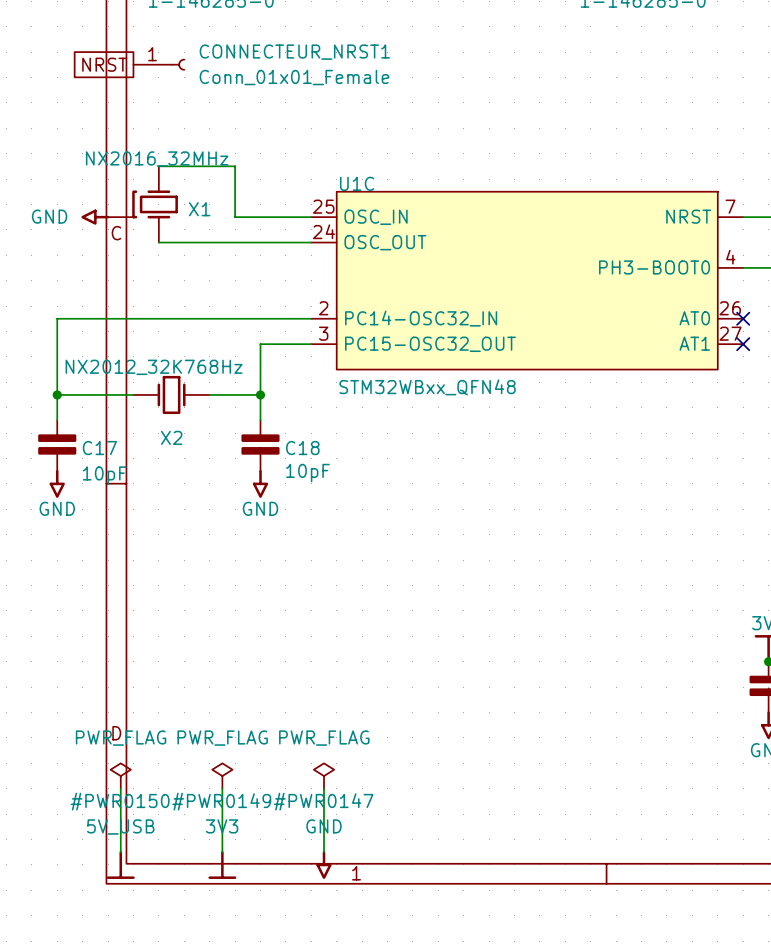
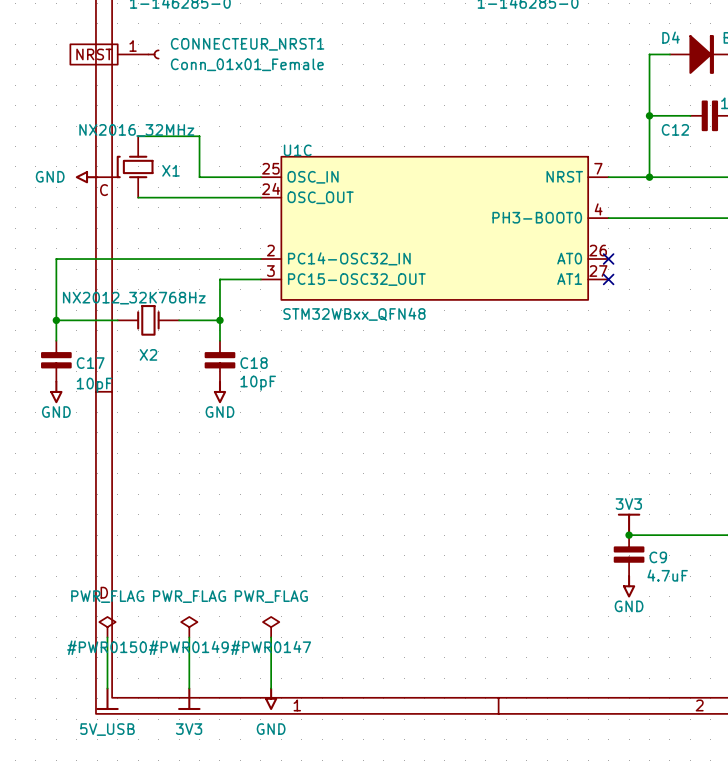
#PWR0149 text position: 3V3 (222, 826) -> 3V3 (189, 729)
#PWR0147 text position: GND (324, 826) -> GND (271, 729)
#PWR0150 text position: 5V_USB (120, 827) -> 5V_USB (107, 729)

